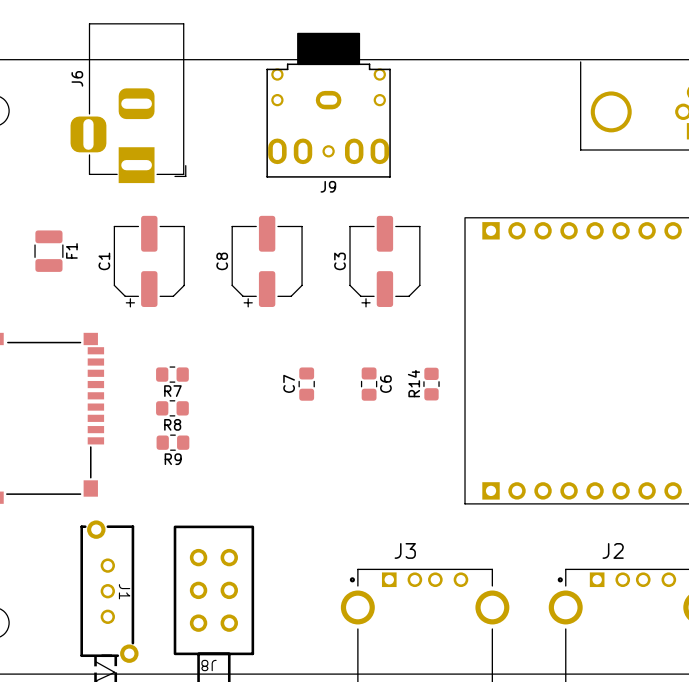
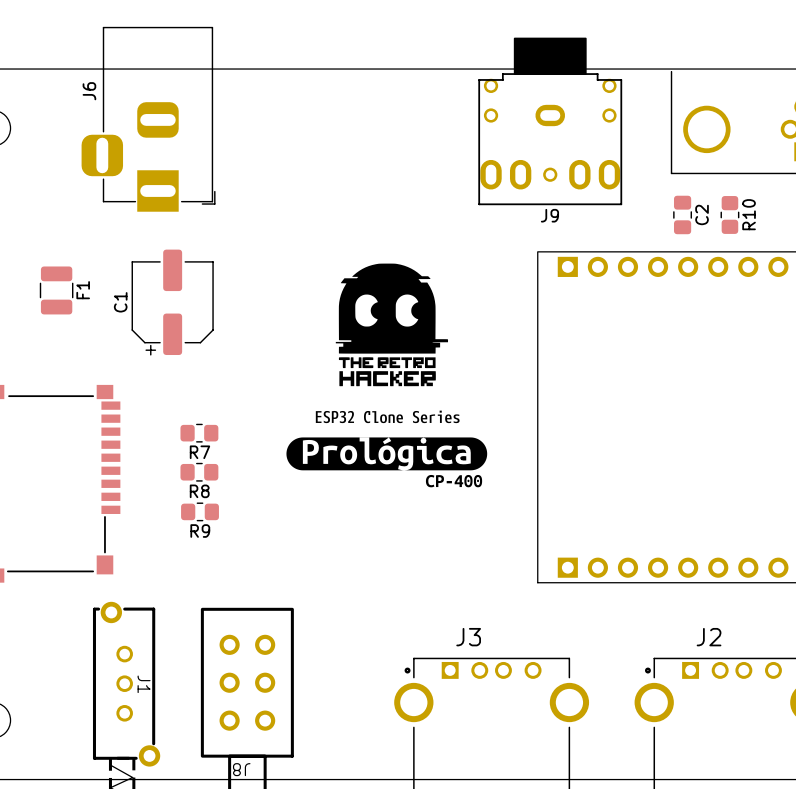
J9 position: (328, 105) -> (550, 121)
C2: none -> (682, 214)
R10: none -> (729, 214)
drawing: none -> [335, 263, 449, 387]
C8: (267, 261) -> none
C3: (384, 261) -> none
drawing: none -> [315, 410, 460, 424]
drawing: none -> [286, 437, 488, 488]
C7: (306, 384) -> none
C6: (369, 384) -> none
R14: (431, 384) -> none

